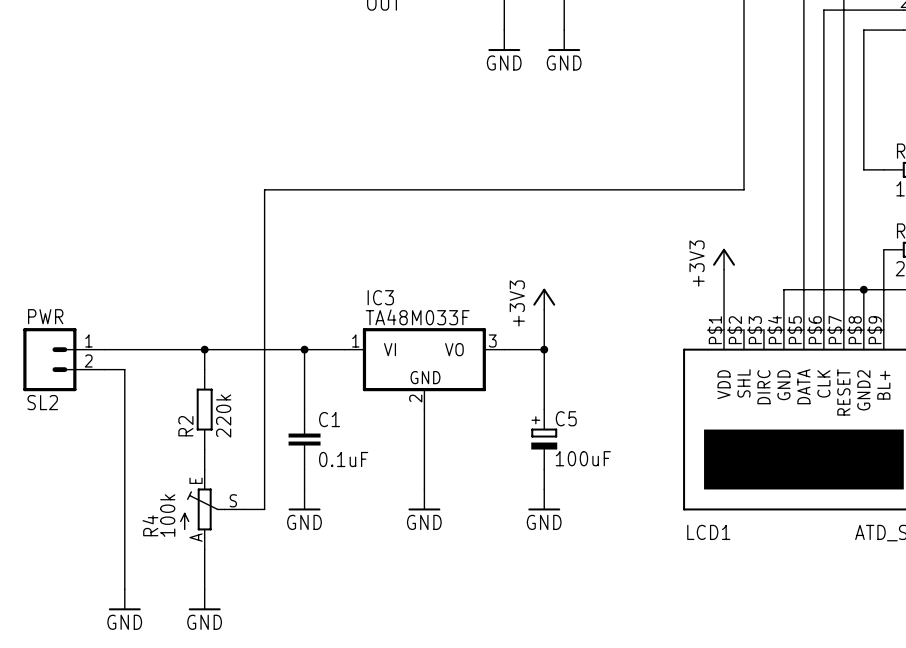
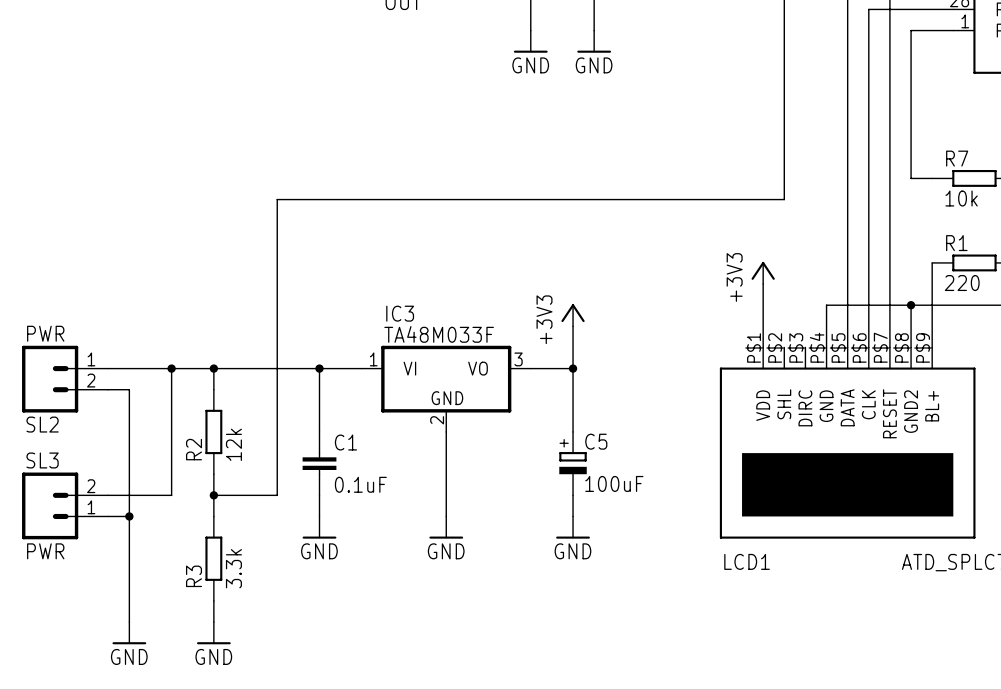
wire: none -> (171, 368) (171, 495) (108, 495)
junction: none -> (171, 368)
R2 value: 220k (223, 416) -> 12k (233, 444)
junction: none -> (213, 495)
wire: (264, 469) (264, 509) (244, 509) -> (277, 495) (213, 495) (213, 516)
SL3: none -> PWR (65, 505)
wire: none -> (108, 516) (129, 516)
junction: none -> (129, 516)
R4: 100k (212, 509) -> none
R3: none -> 3.3k (213, 558)

